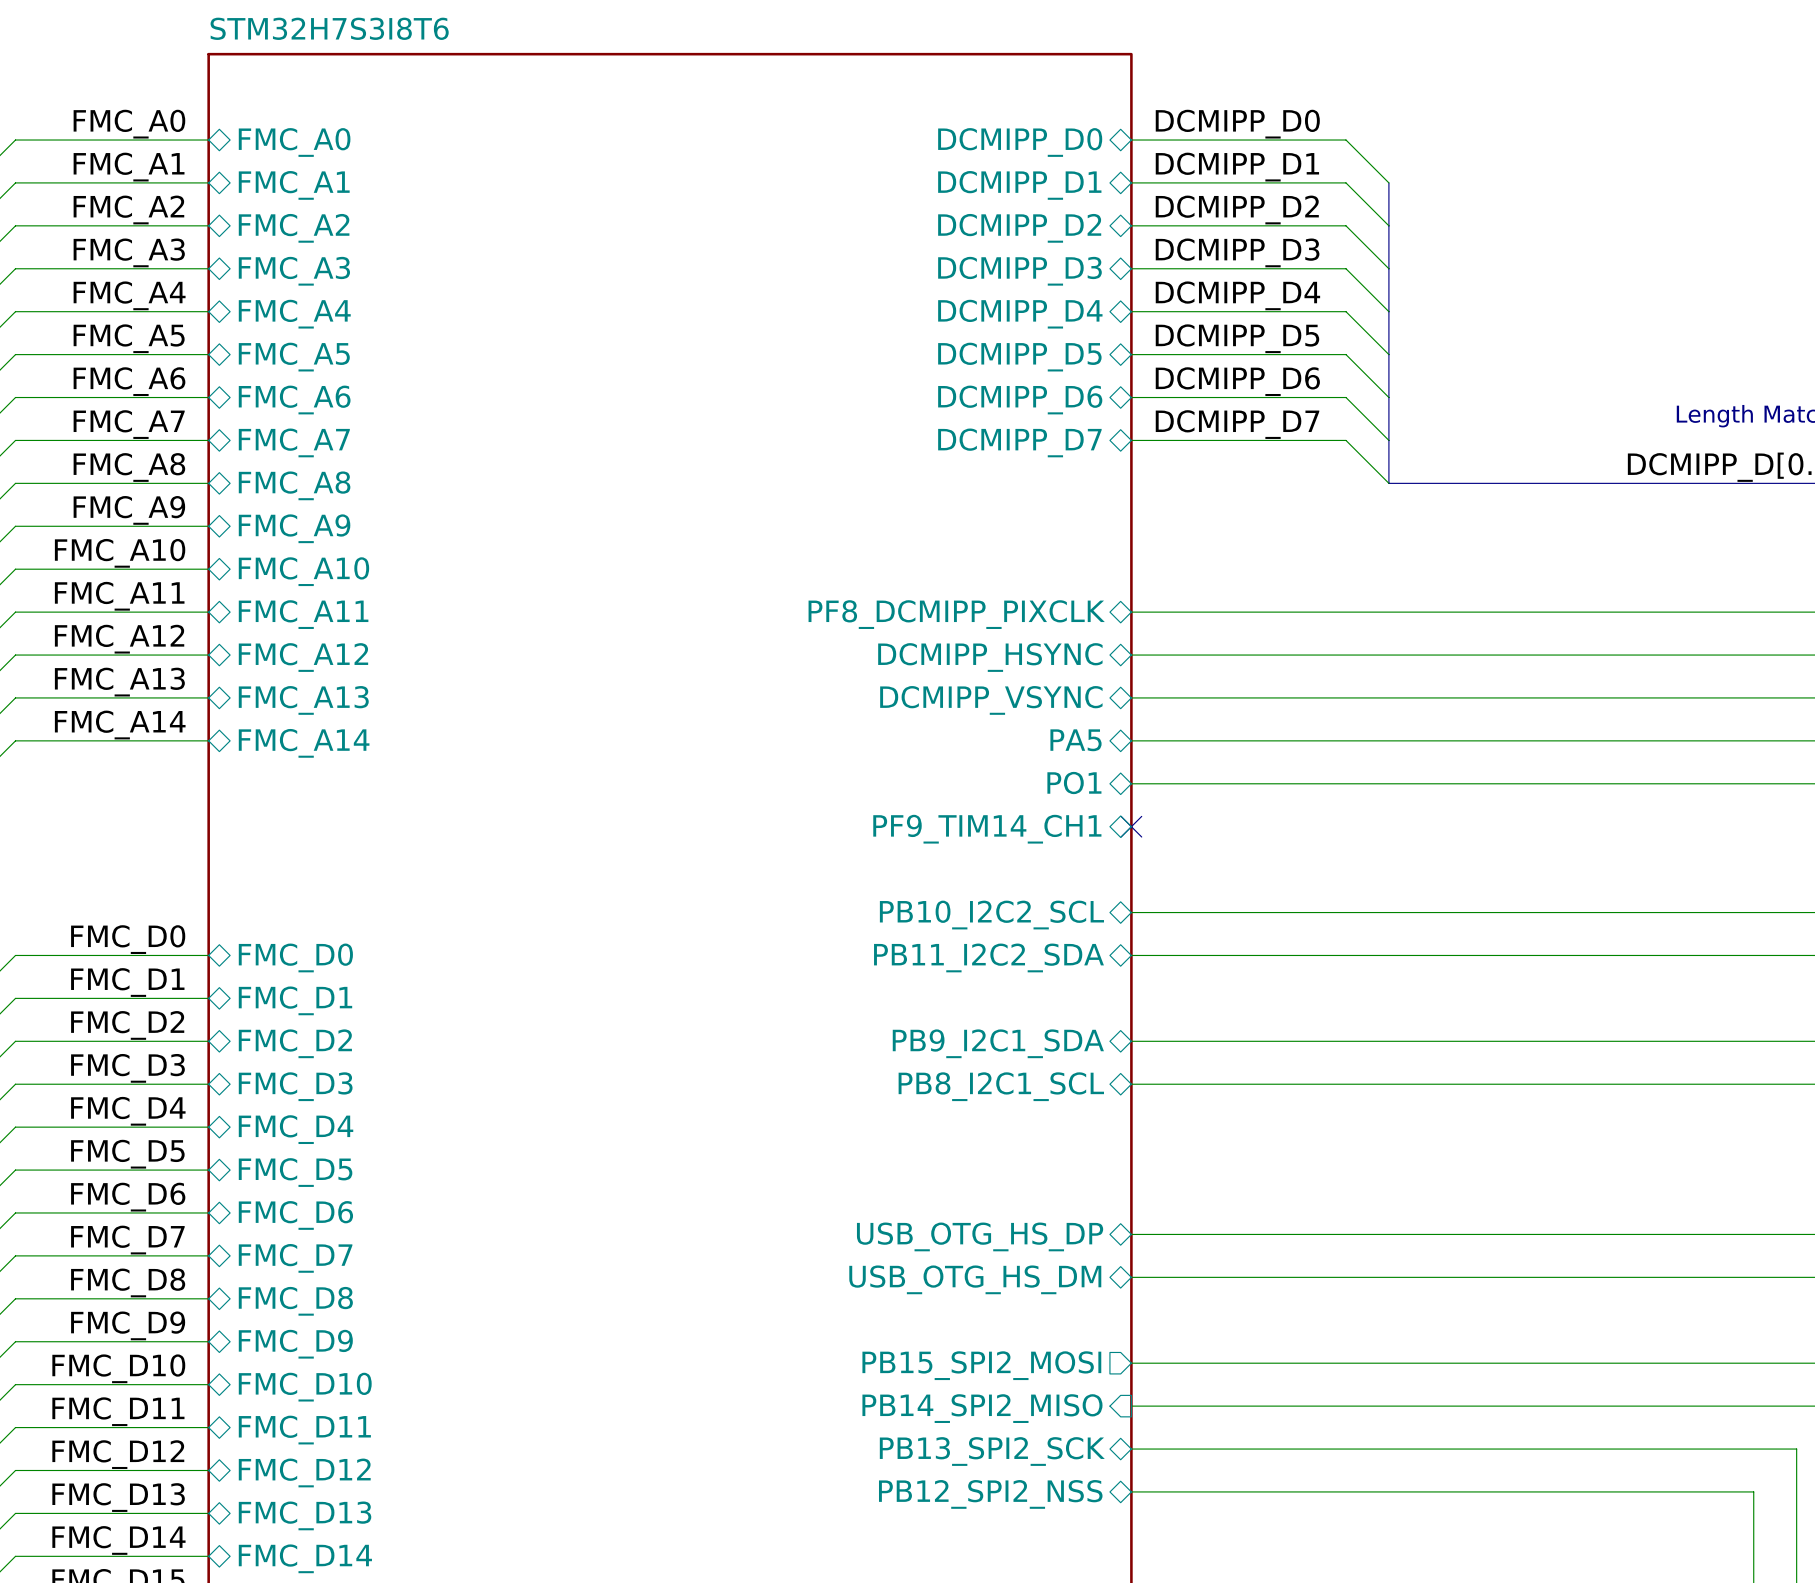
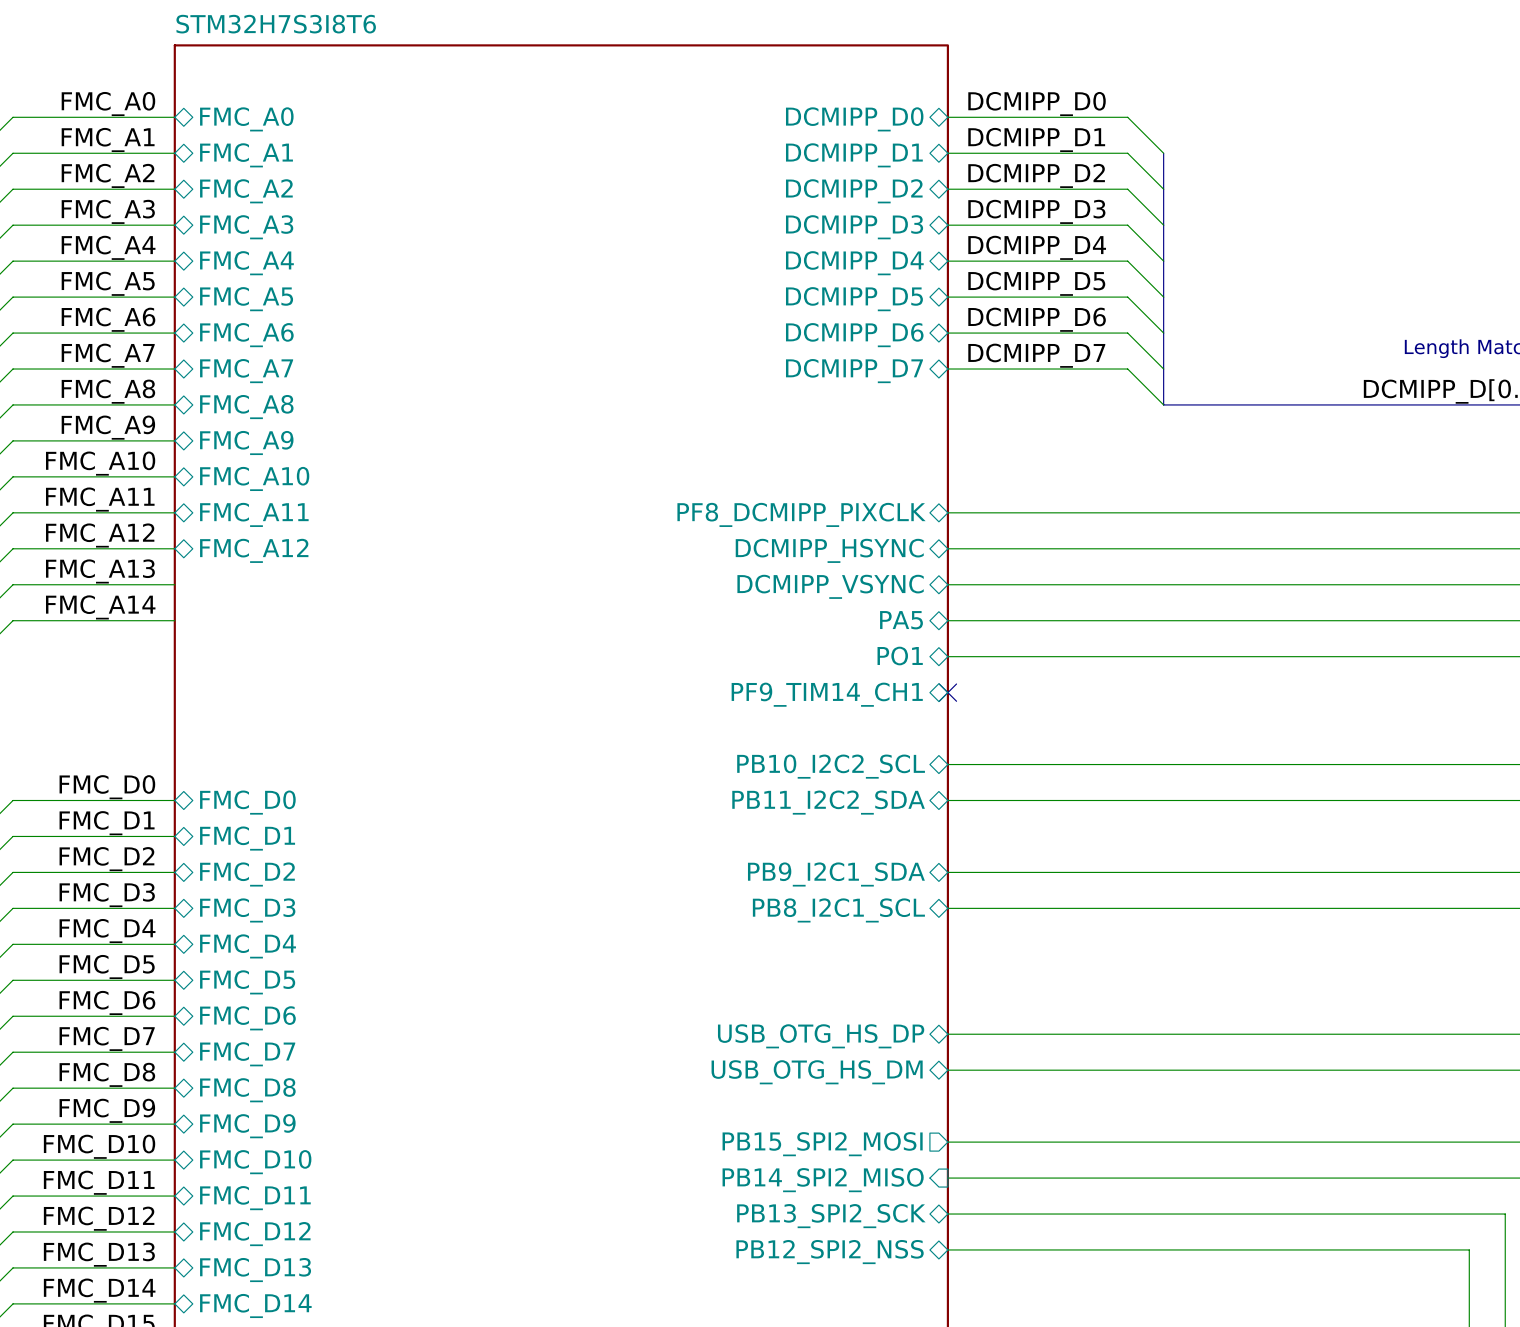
sheet pin: FMC_A13 (303, 700) -> none
sheet pin: FMC_A14 (304, 743) -> none

